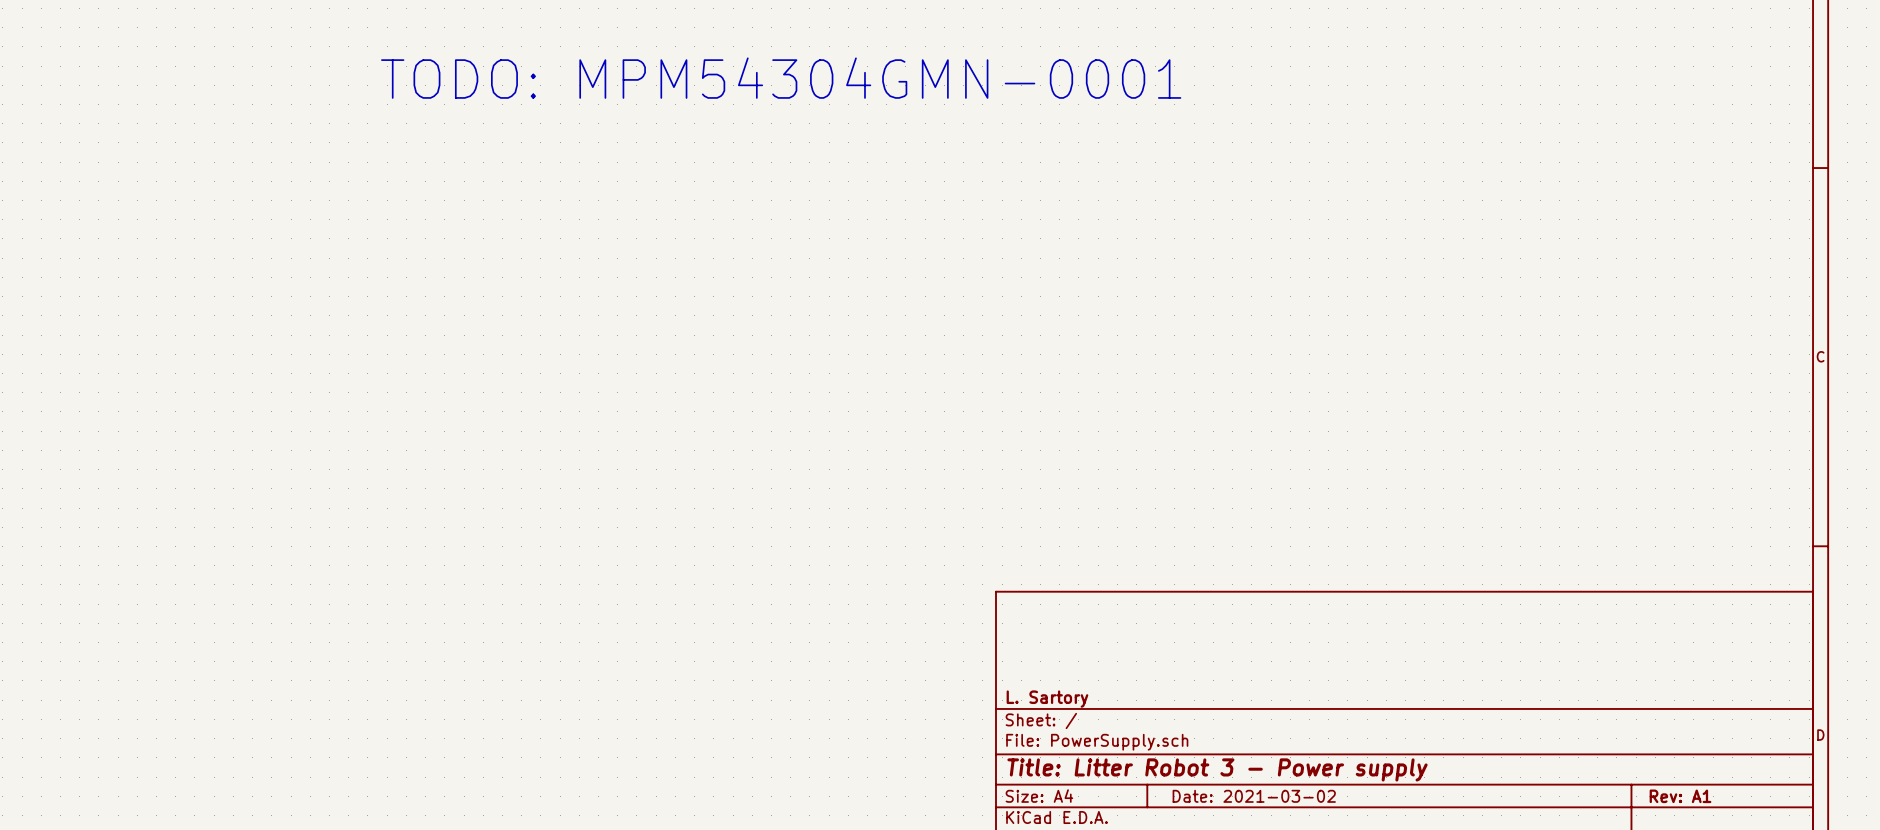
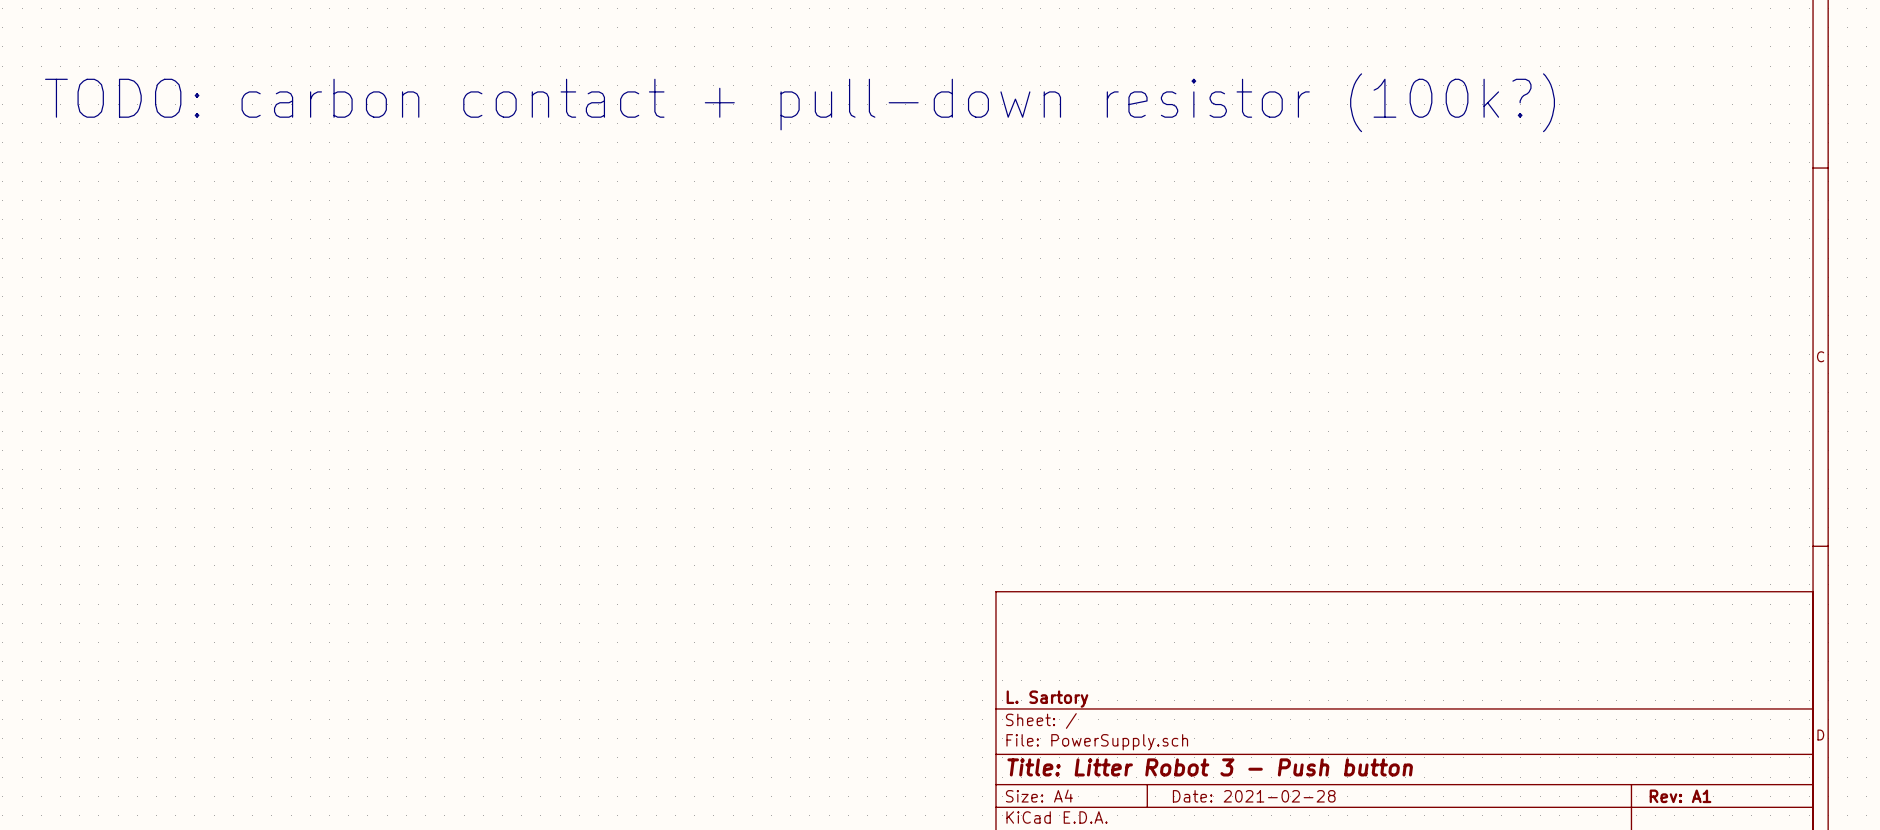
text: TODO: MPM54304GMN-0001 (781, 78) -> none
text: none -> TODO: carbon contact + pull-down resistor (100k?) (800, 102)
title block: Title: Litter Robot 3 - Power supply (1217, 769) -> Title: Litter Robot 3 - Push button (1210, 767)
title block: Date: 2021-03-02 (1254, 796) -> Date: 2021-02-28 (1254, 796)

